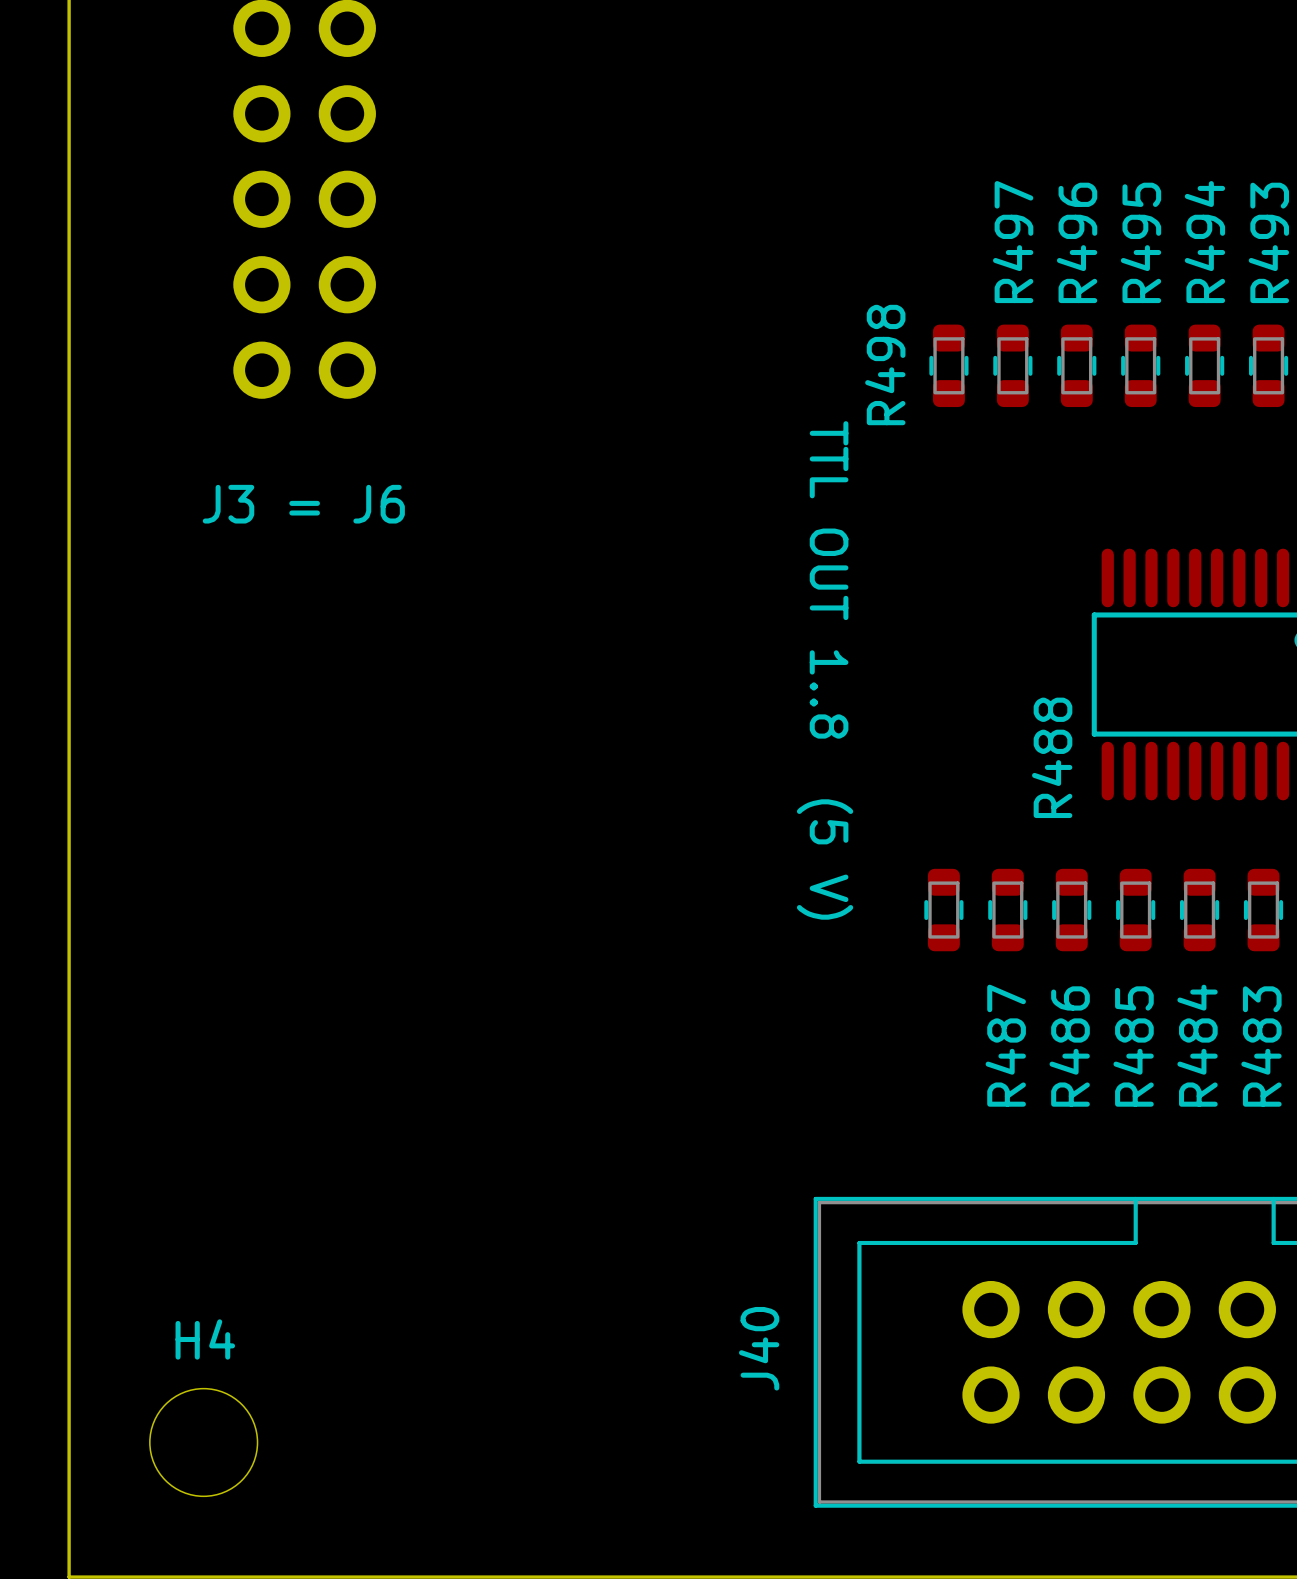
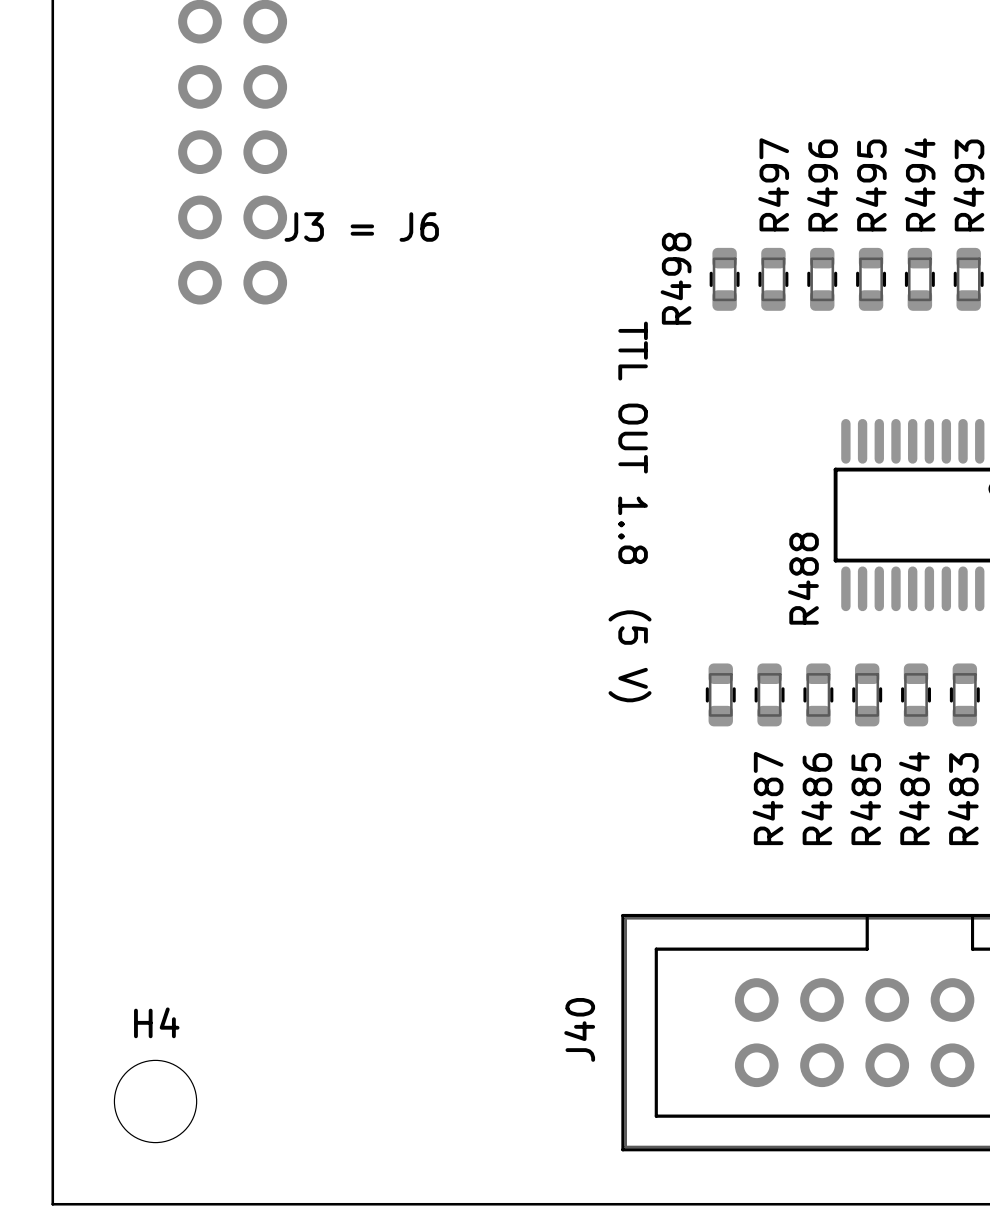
text position: J3 = J6 (303, 504) -> J3 = J6 (361, 227)

